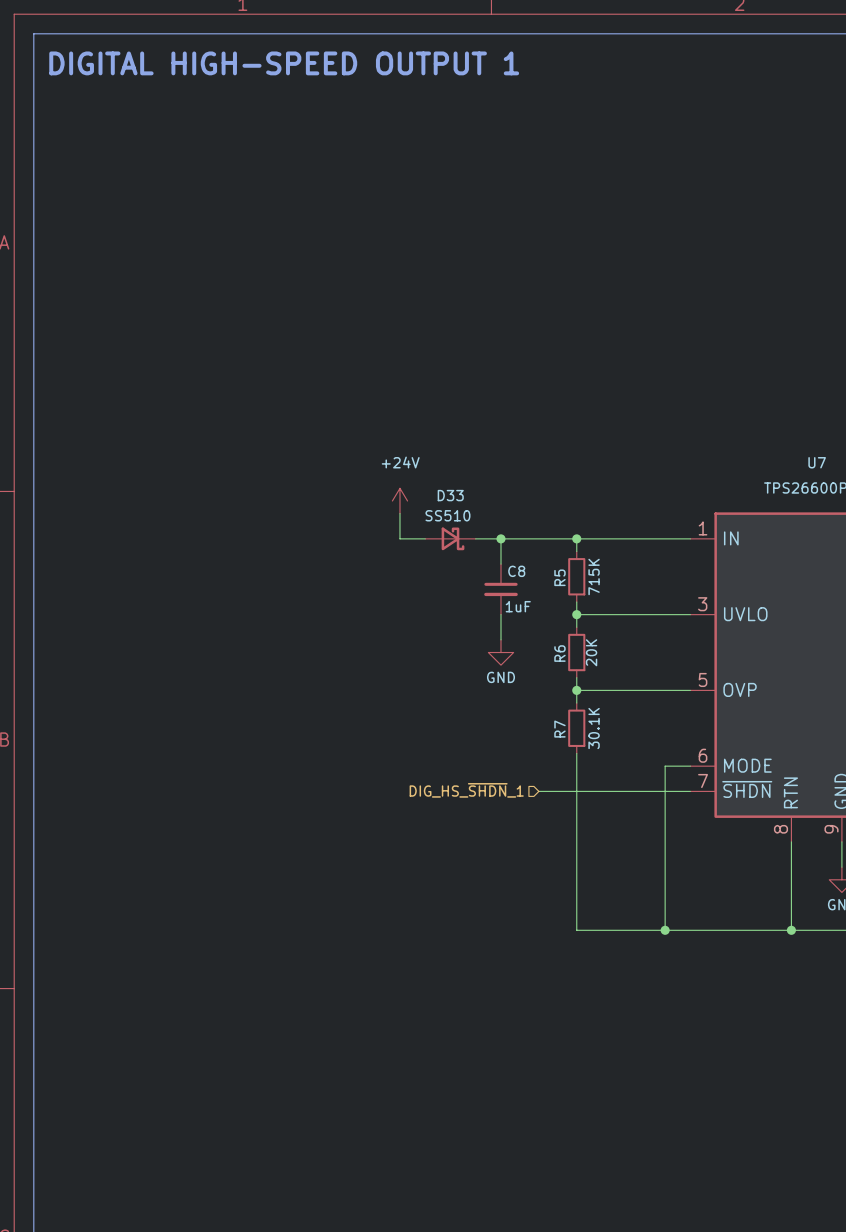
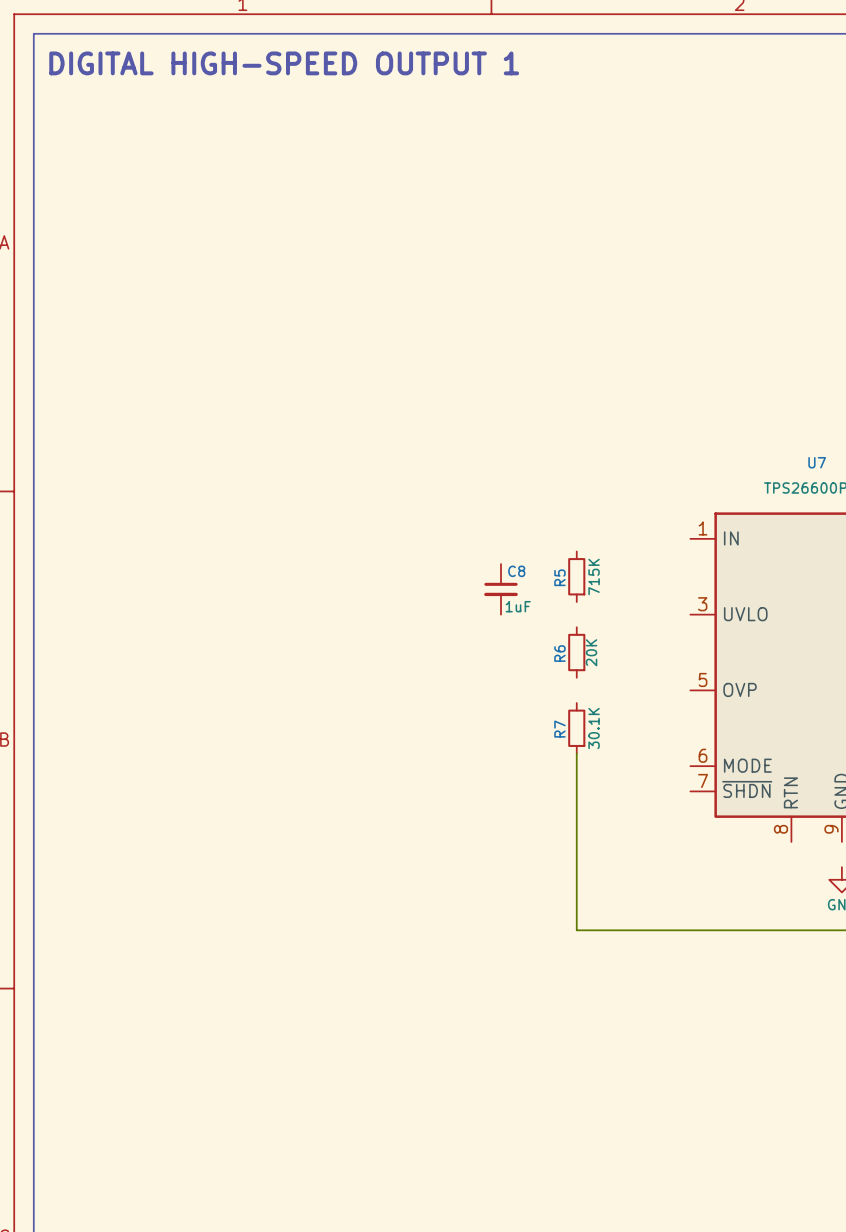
power symbol: +24V (399, 500) -> none
wire: (399, 513) (399, 538) (425, 538) -> none
D33: SS510 (450, 538) -> none
wire: (475, 538) (690, 538) -> none
wire: (500, 538) (500, 564) -> none
junction: (500, 538) -> none
wire: (576, 538) (576, 551) -> none
junction: (576, 538) -> none
wire: (576, 602) (576, 627) -> none
wire: (500, 614) (500, 639) -> none
wire: (576, 614) (690, 614) -> none
junction: (576, 614) -> none
power symbol: GND (500, 652) -> none
wire: (576, 677) (576, 703) -> none
wire: (576, 690) (690, 690) -> none
junction: (576, 690) -> none
wire: (690, 766) (665, 766) (665, 930) -> none
hierarchical label: DIG_HS_~{SHDN}_1 (466, 790) -> none
wire: (538, 791) (690, 791) -> none
wire: (791, 841) (791, 930) -> none
wire: (841, 841) (841, 867) -> none
junction: (665, 930) -> none
junction: (791, 930) -> none

